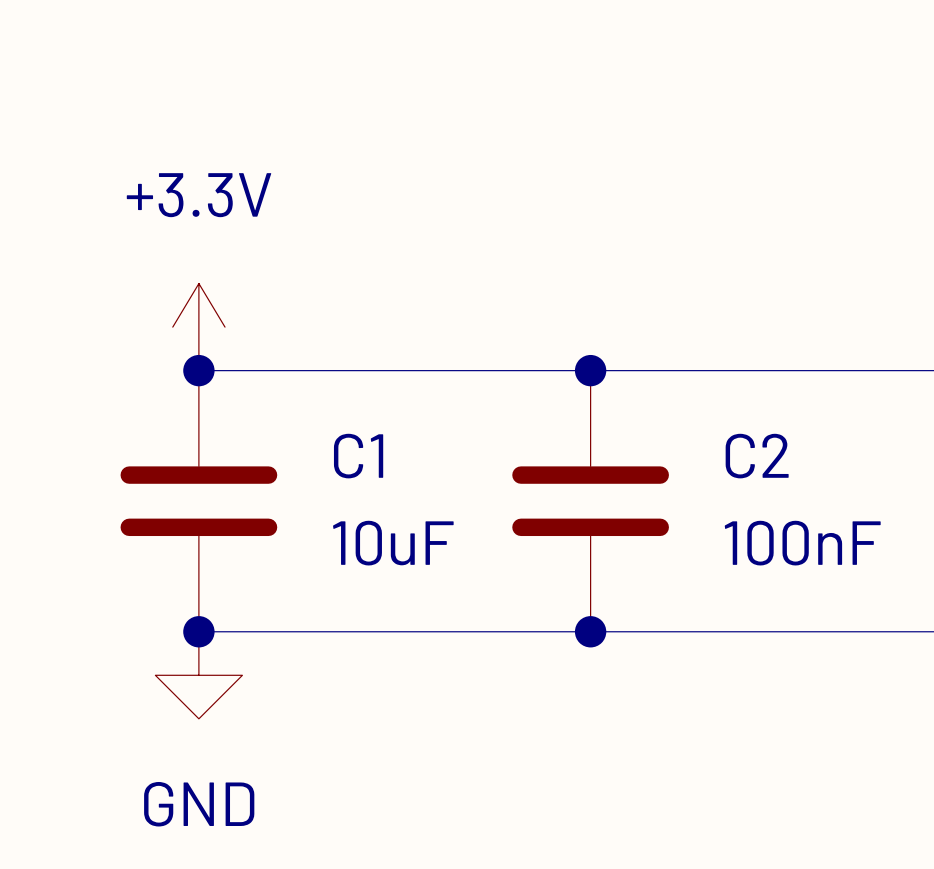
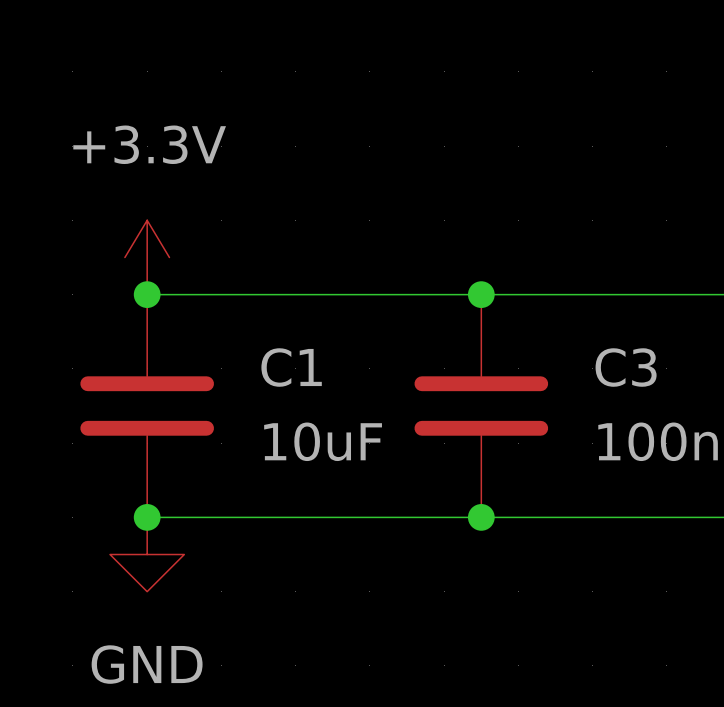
C2 name: C2 (757, 456) -> C3 (626, 367)

